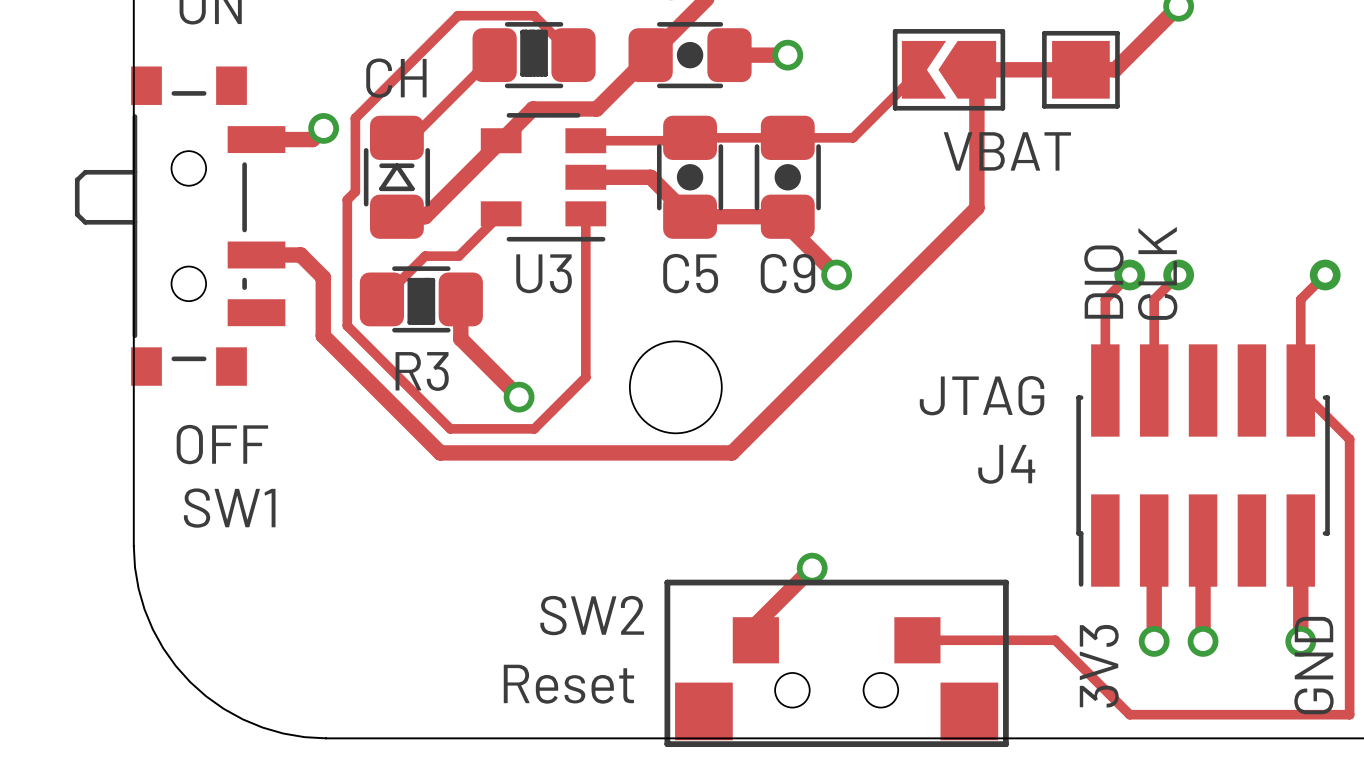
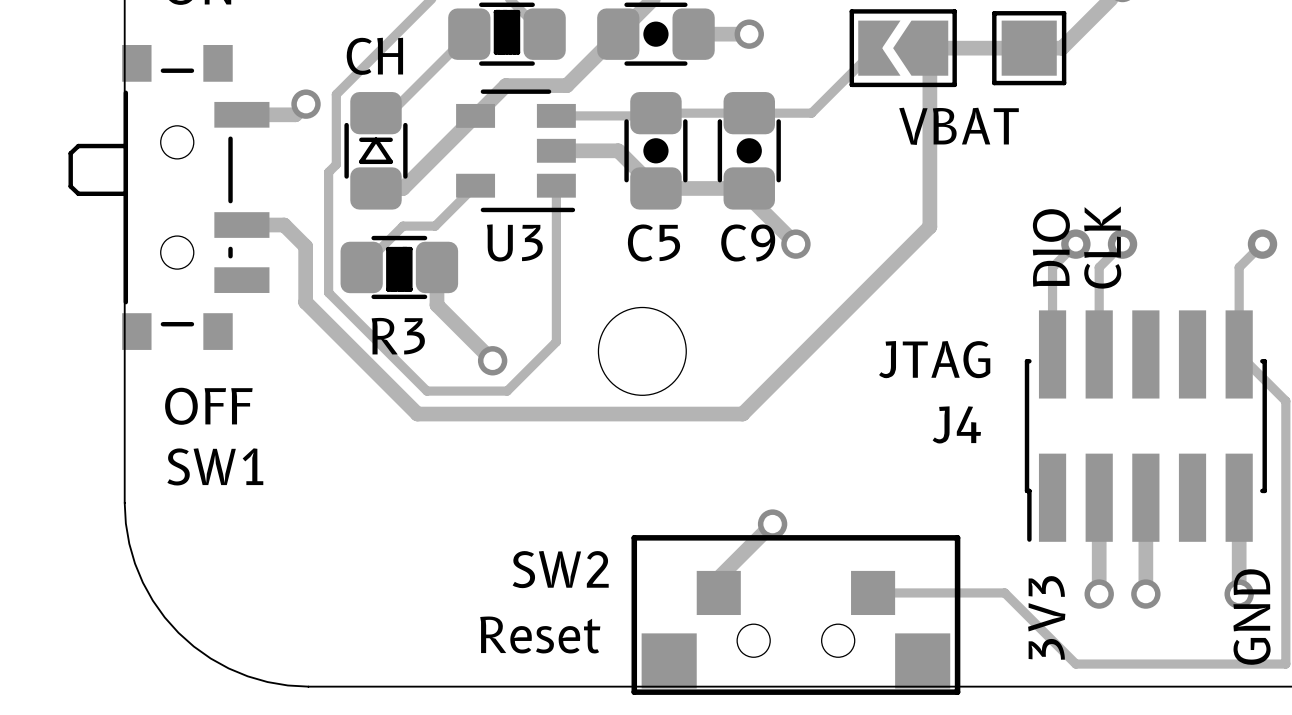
track: (976, 208) (732, 452) -> (929, 180) (929, 226) (742, 414) (695, 414)

